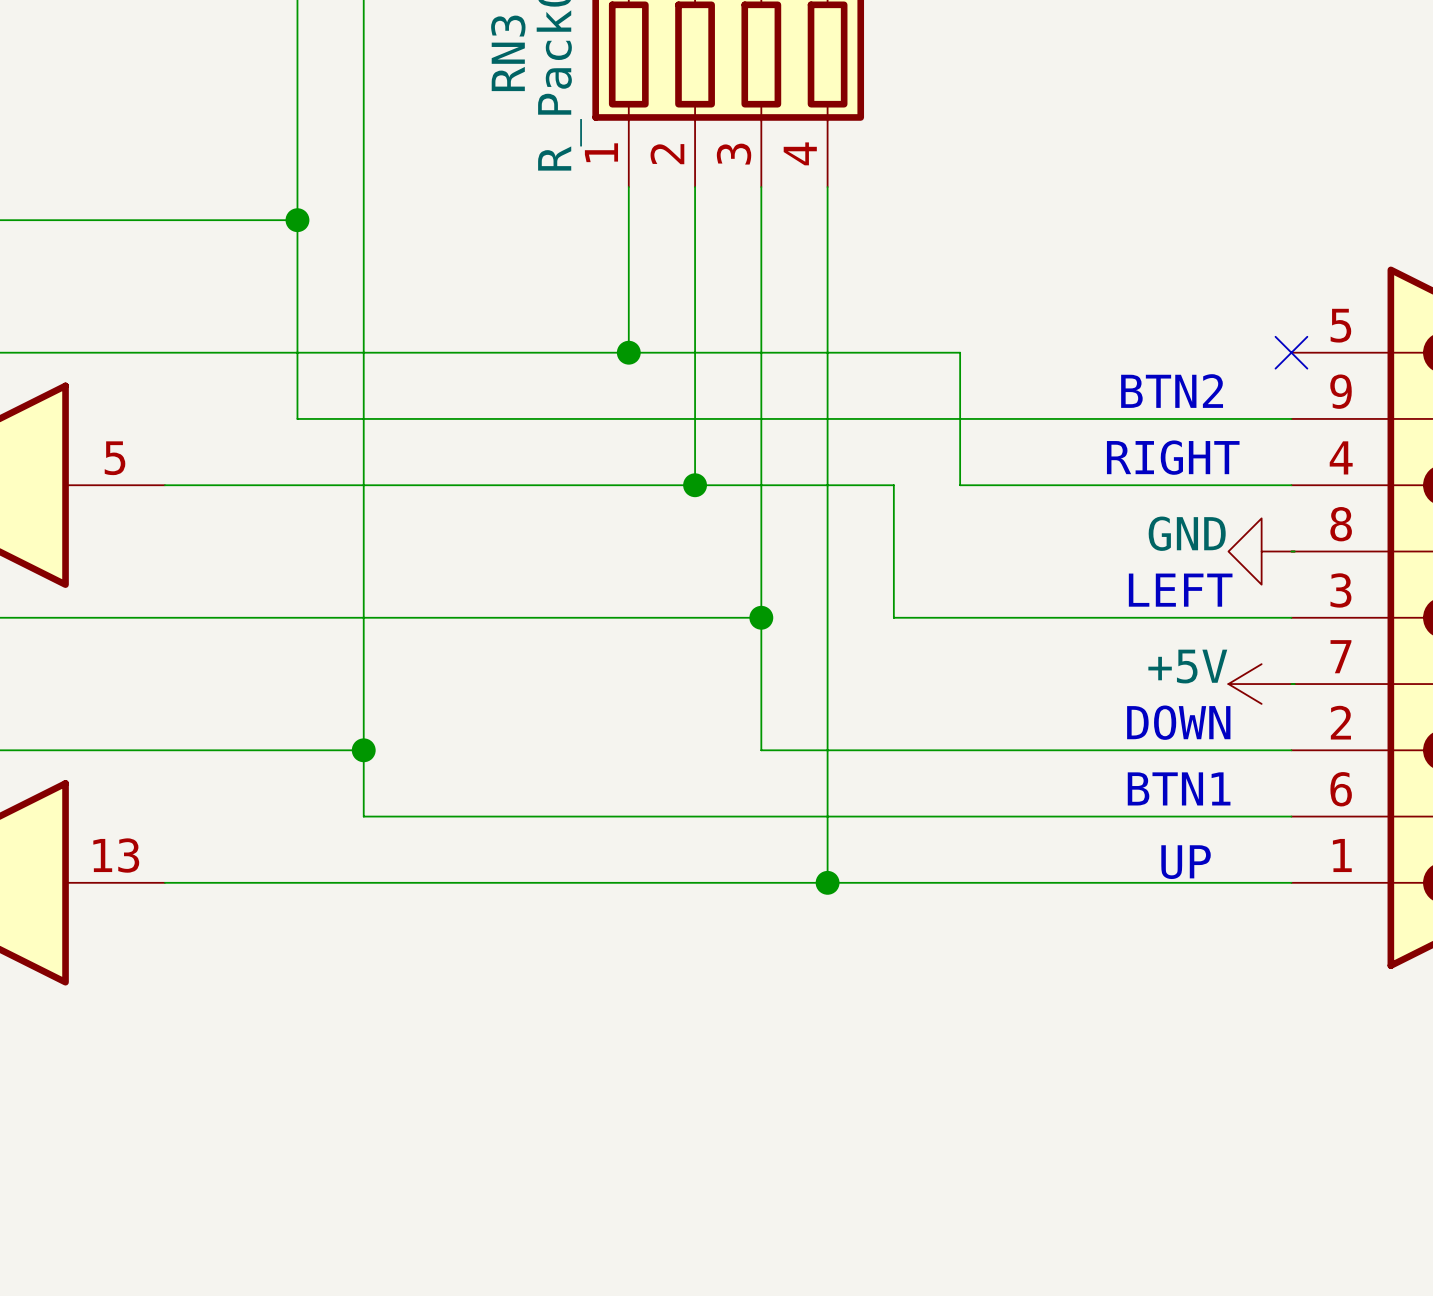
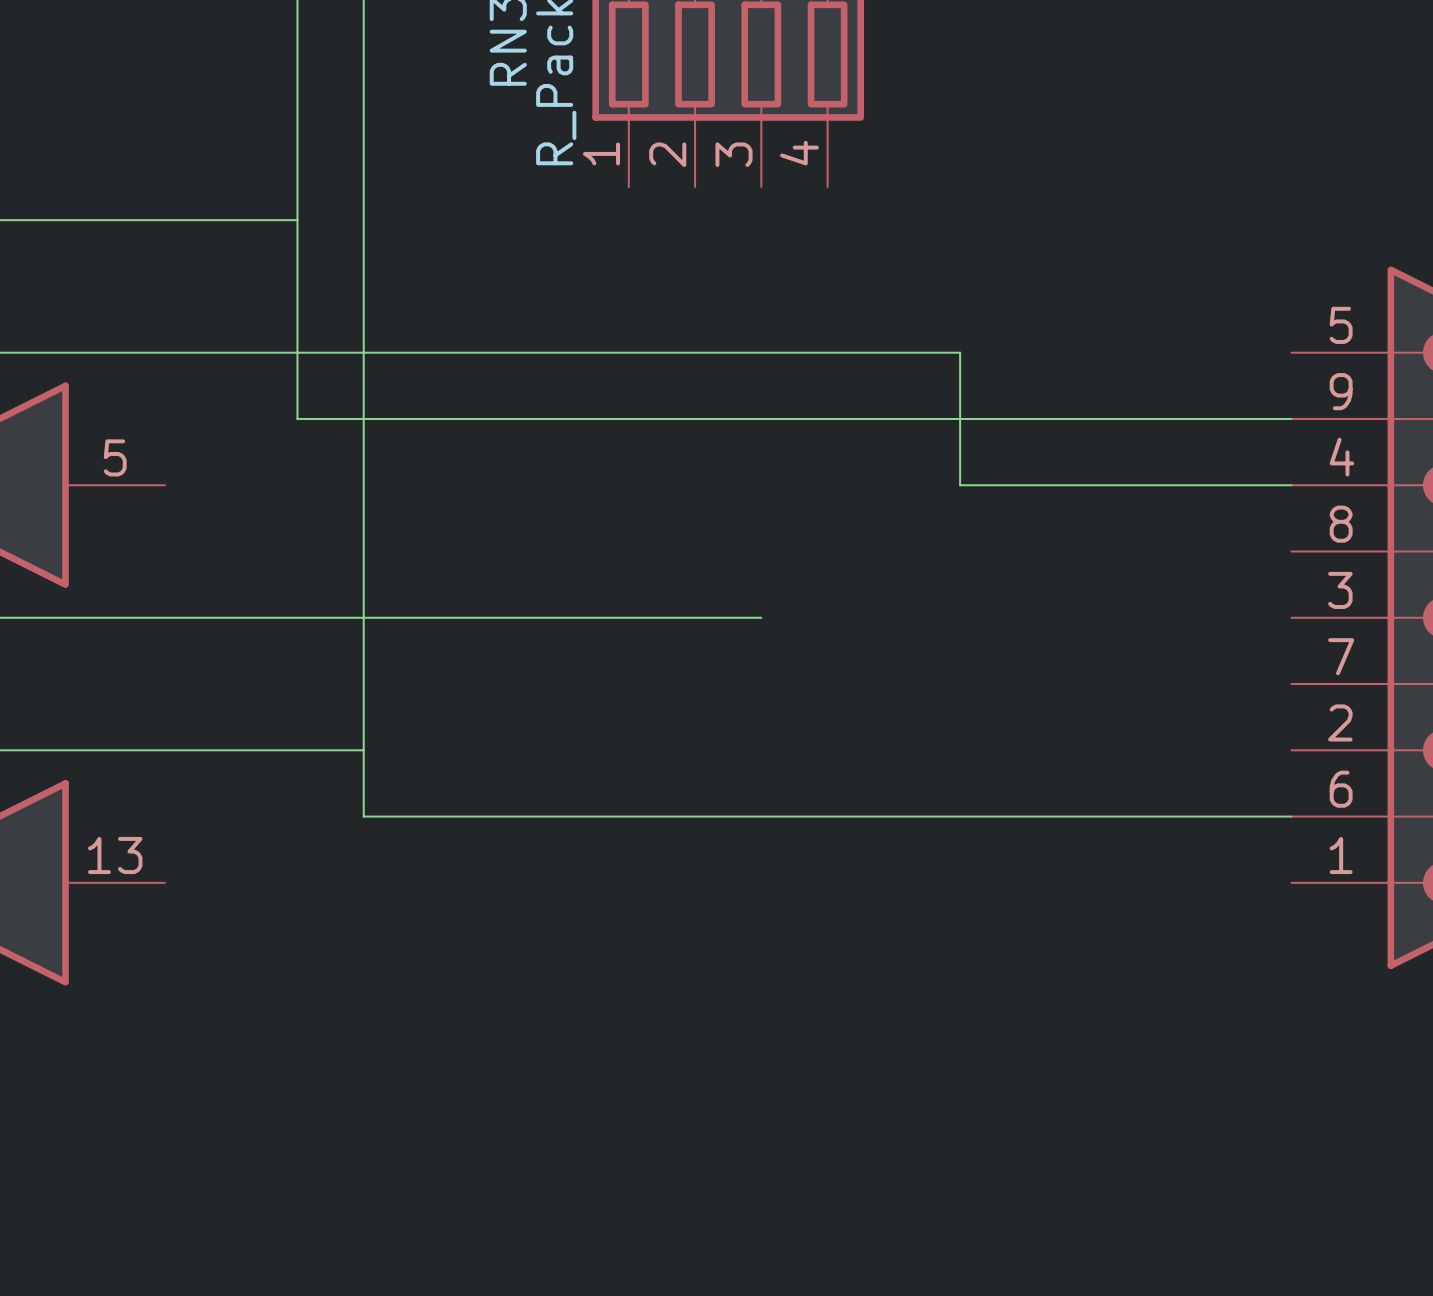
wire: (628, 187) (628, 352) -> none
wire: (695, 187) (695, 485) -> none
wire: (761, 187) (761, 750) (1291, 750) -> none
wire: (827, 187) (827, 882) -> none
junction: (297, 220) -> none
junction: (628, 352) -> none
no-connect mark: (1291, 352) -> none
text: BTN2 (1172, 391) -> none
text: RIGHT (1173, 457) -> none
wire: (164, 485) (893, 485) (893, 617) (1291, 617) -> none
junction: (695, 485) -> none
power symbol: GND (1261, 551) -> none
text: LEFT (1180, 590) -> none
junction: (761, 617) -> none
power symbol: +5V (1261, 684) -> none
text: DOWN (1178, 722) -> none
junction: (363, 750) -> none
text: BTN1 (1179, 788) -> none
text: UP (1186, 862) -> none
wire: (164, 882) (1291, 882) -> none
junction: (827, 882) -> none

